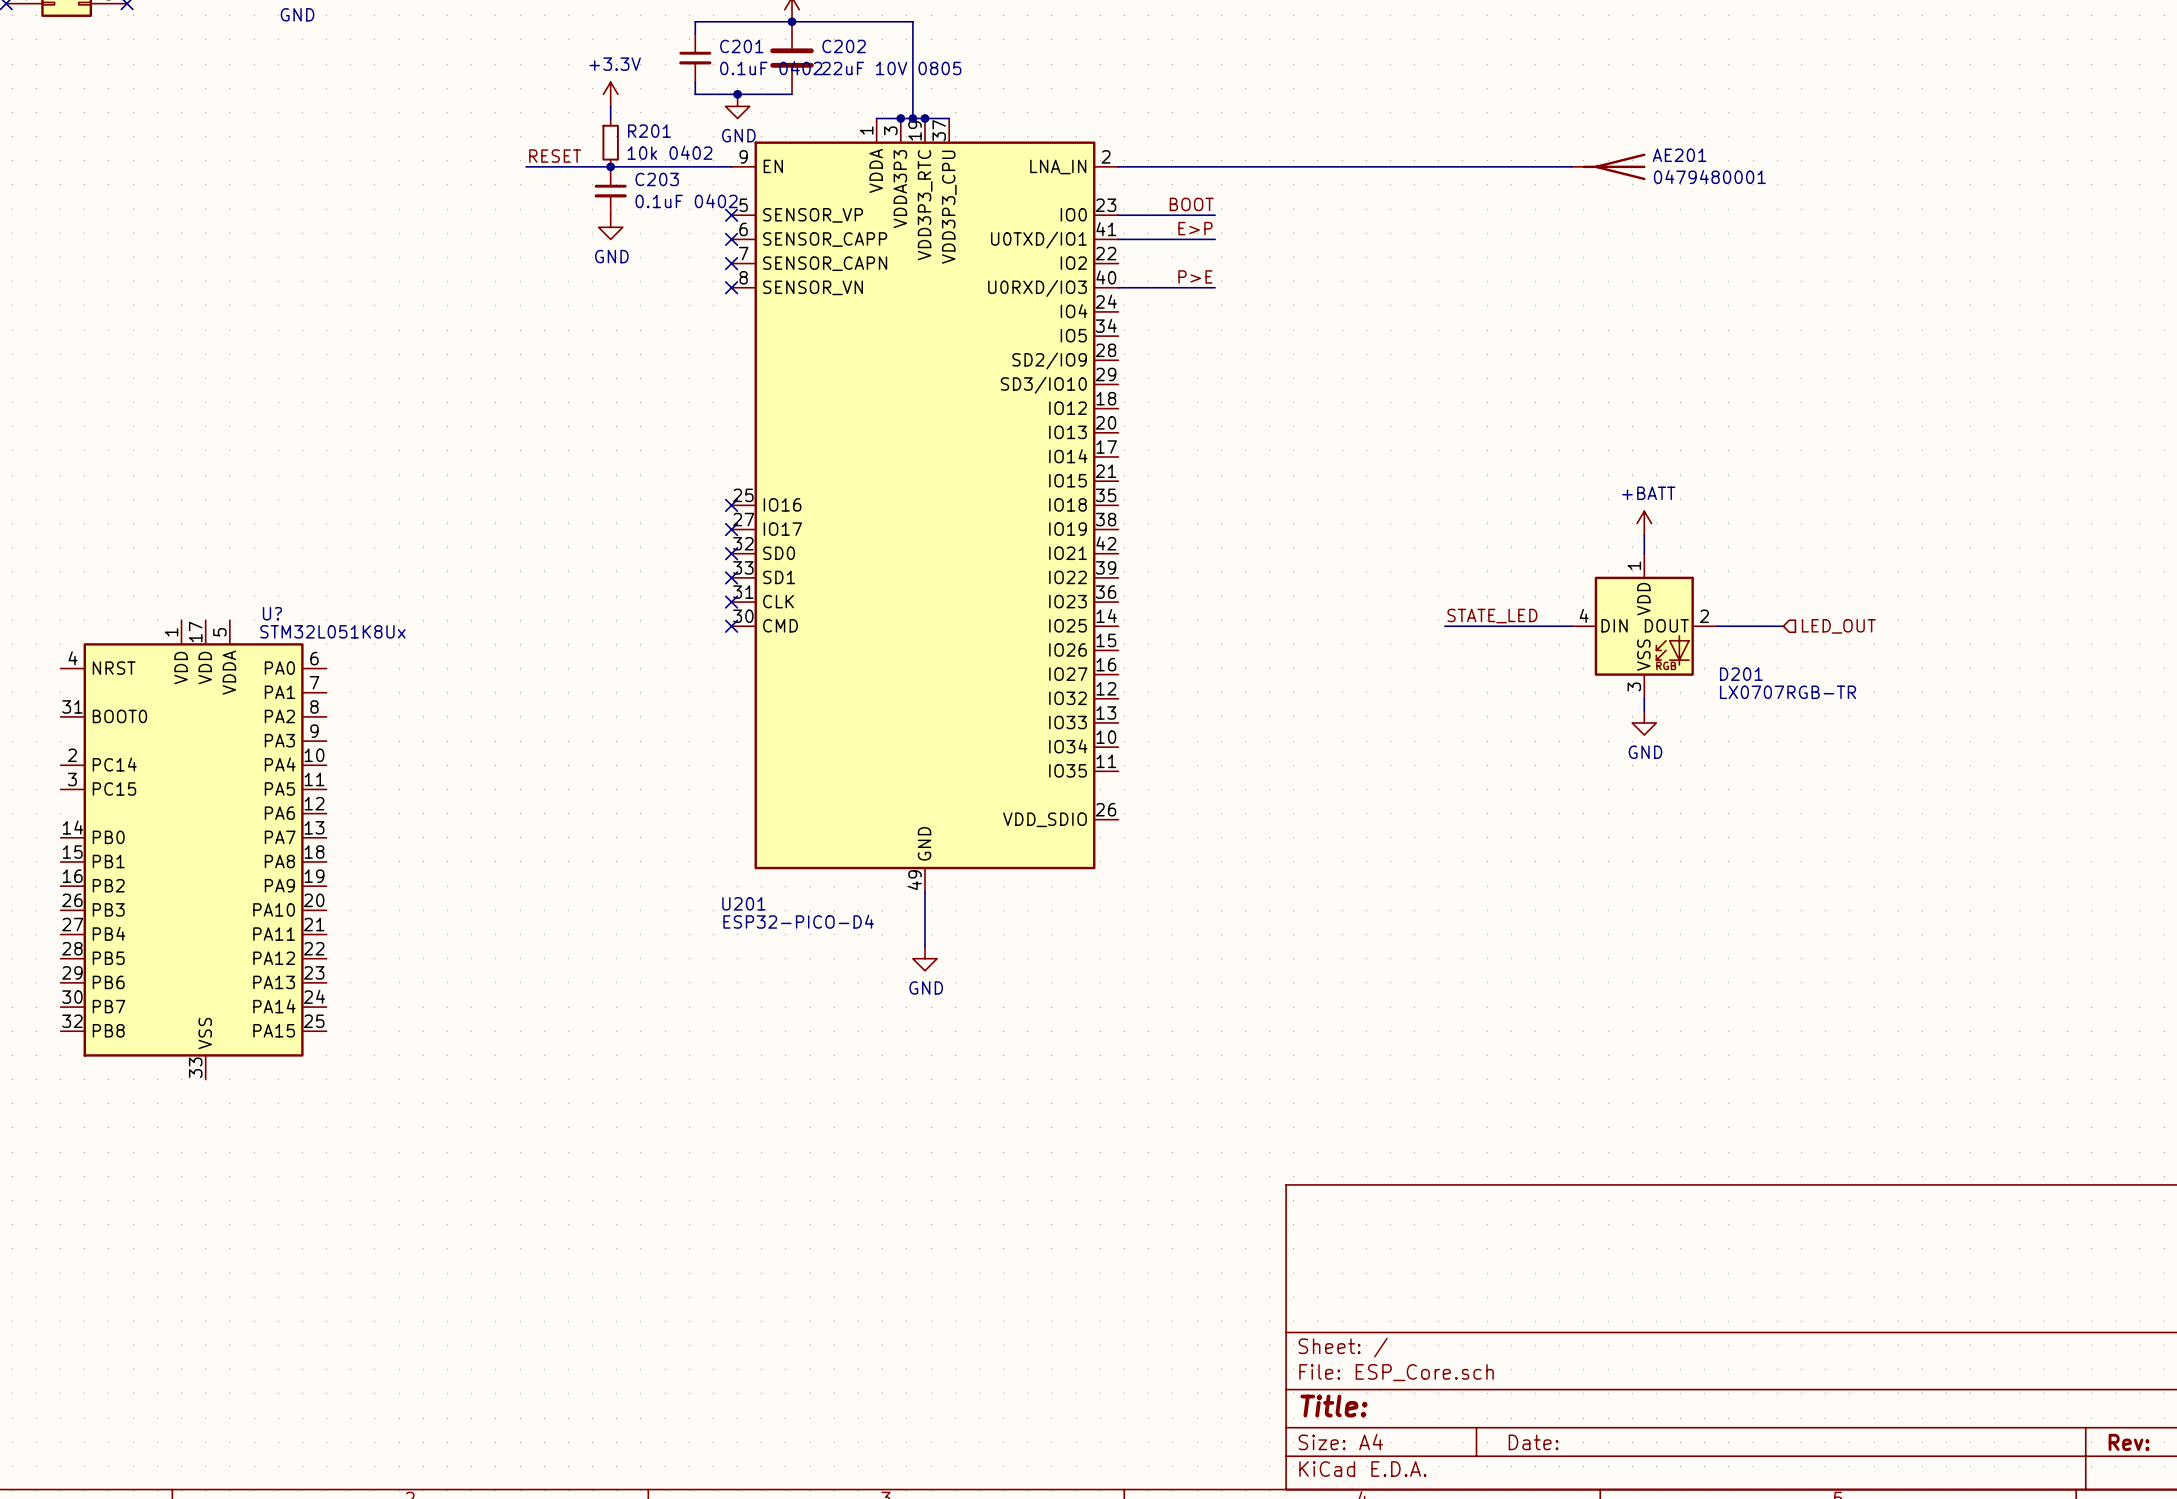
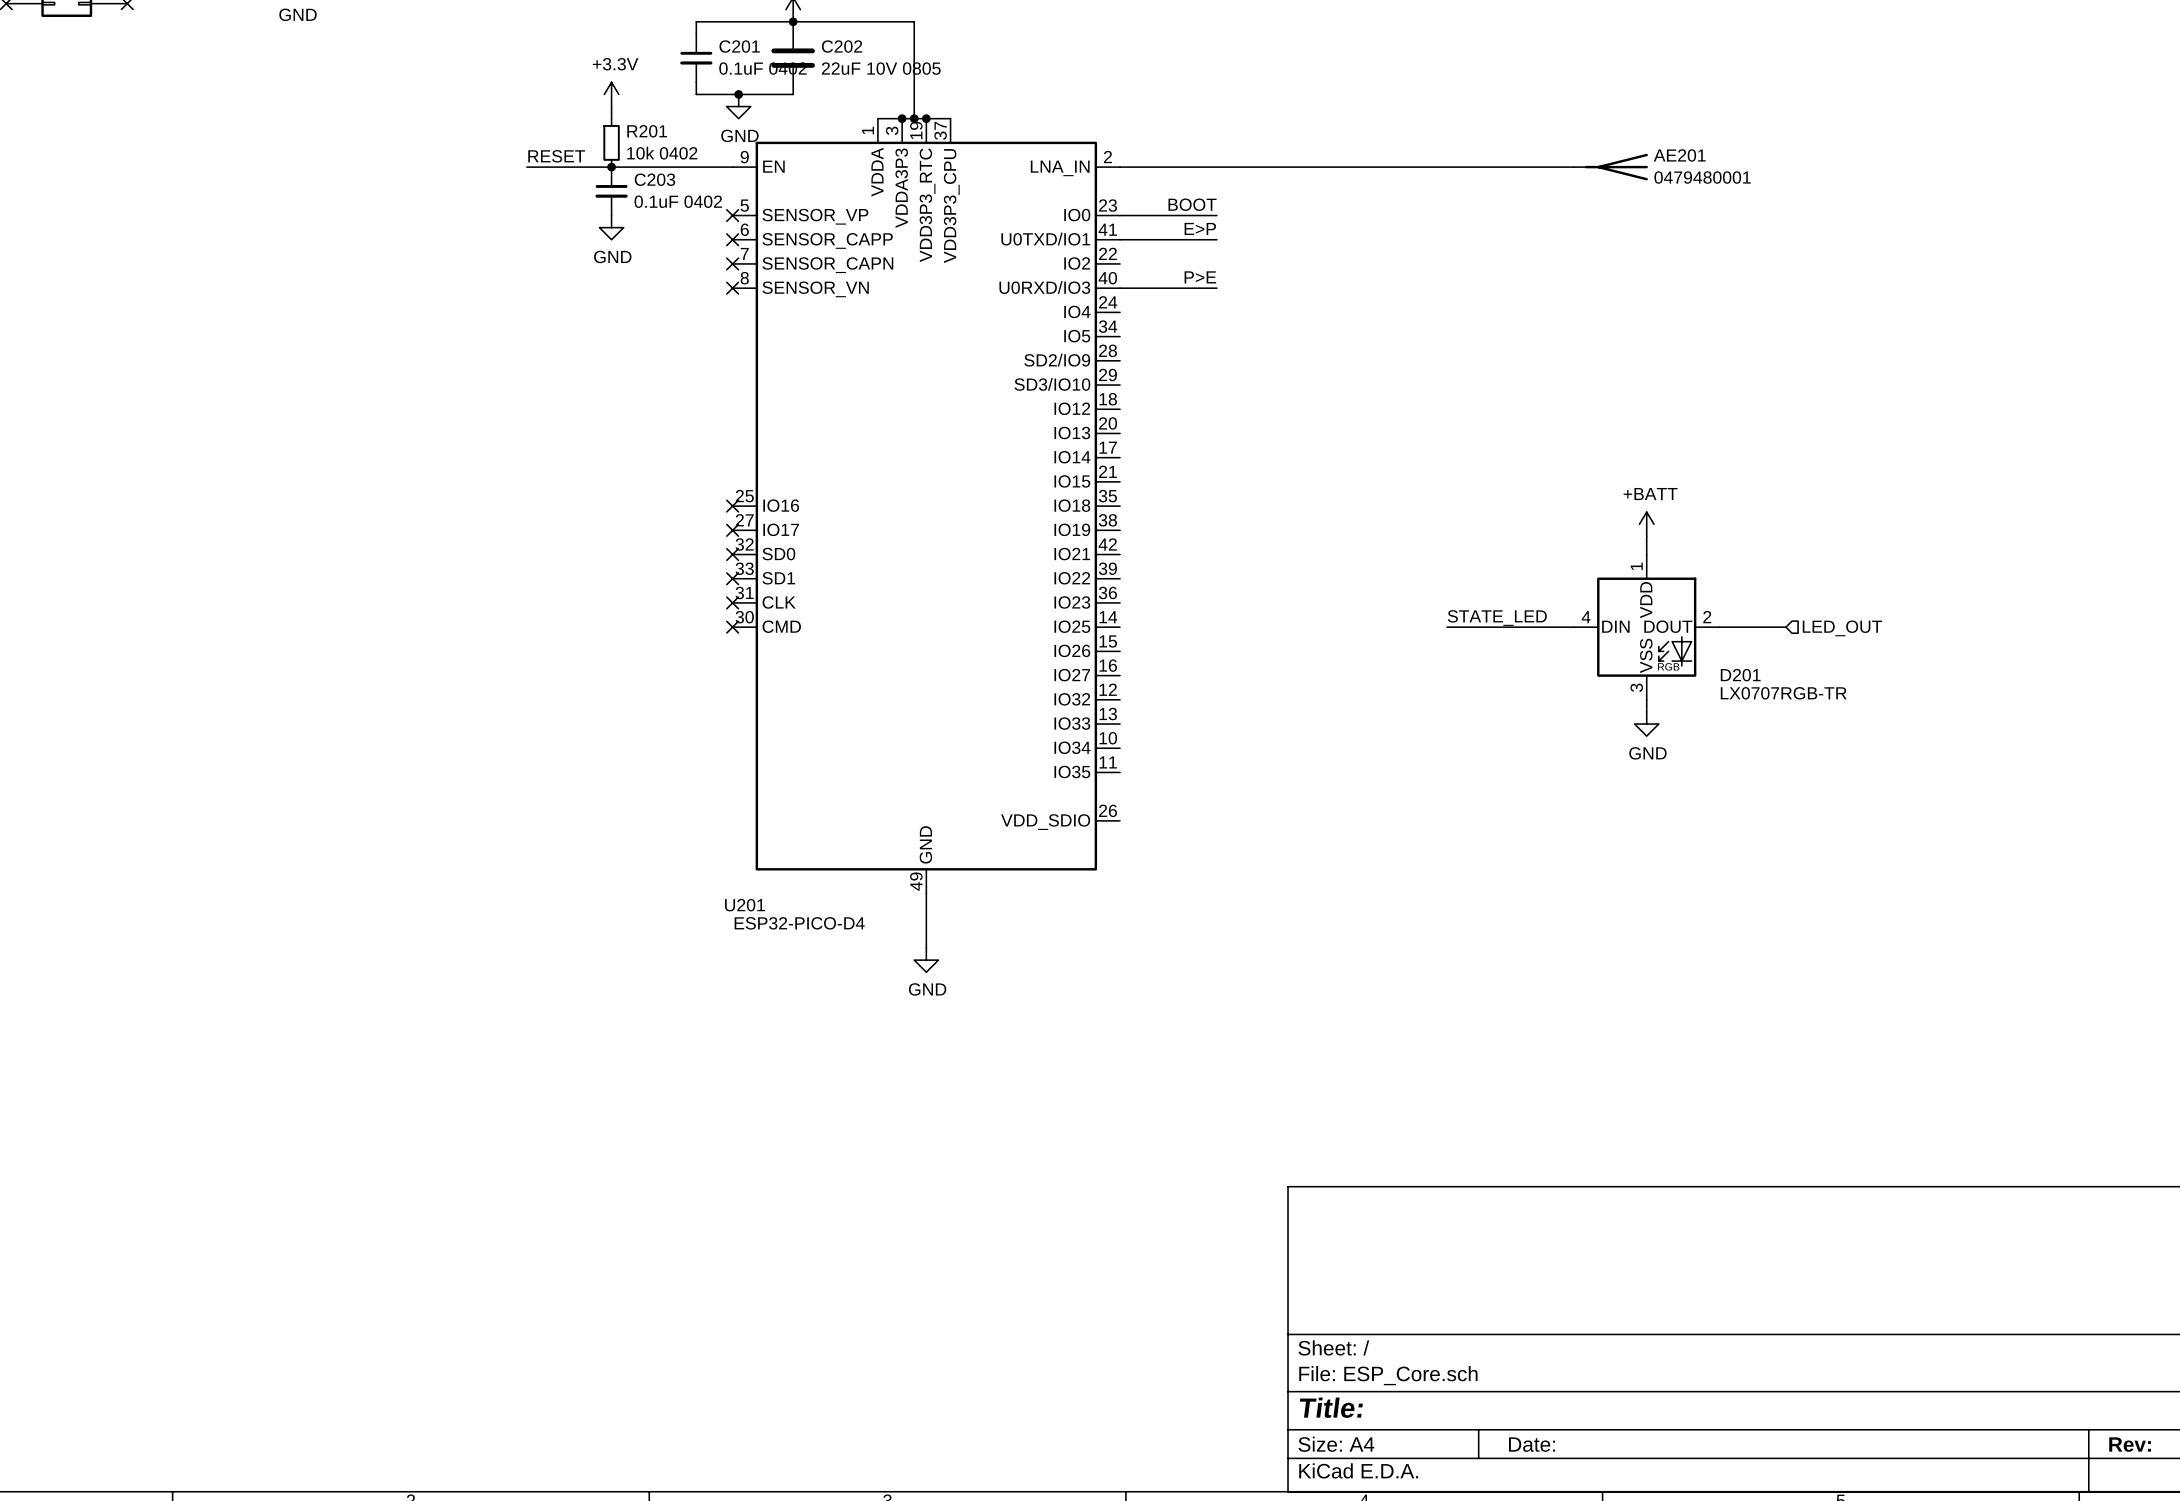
U?: STM32L051K8Ux (193, 849) -> none

